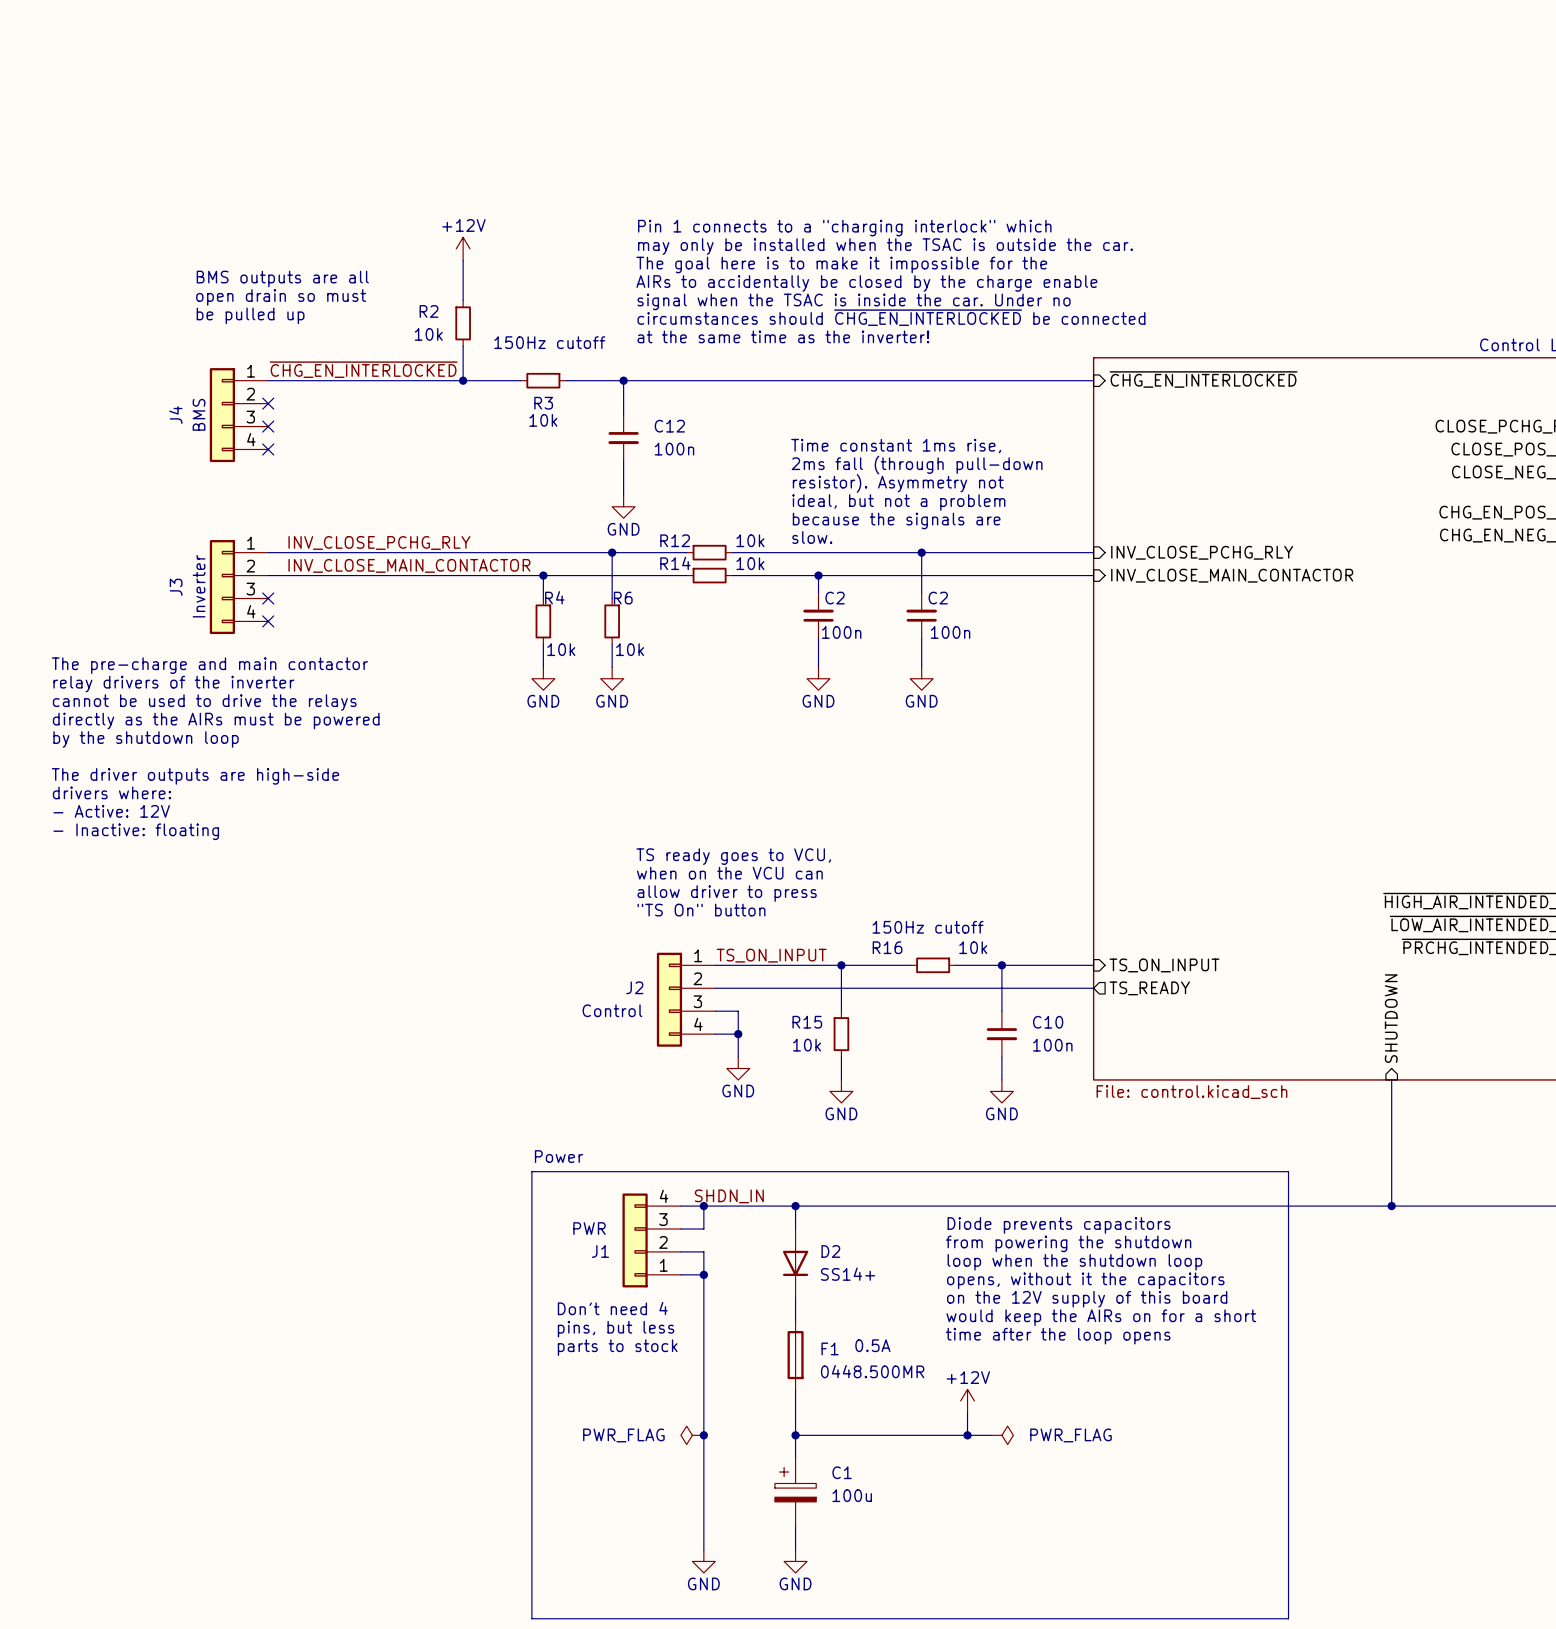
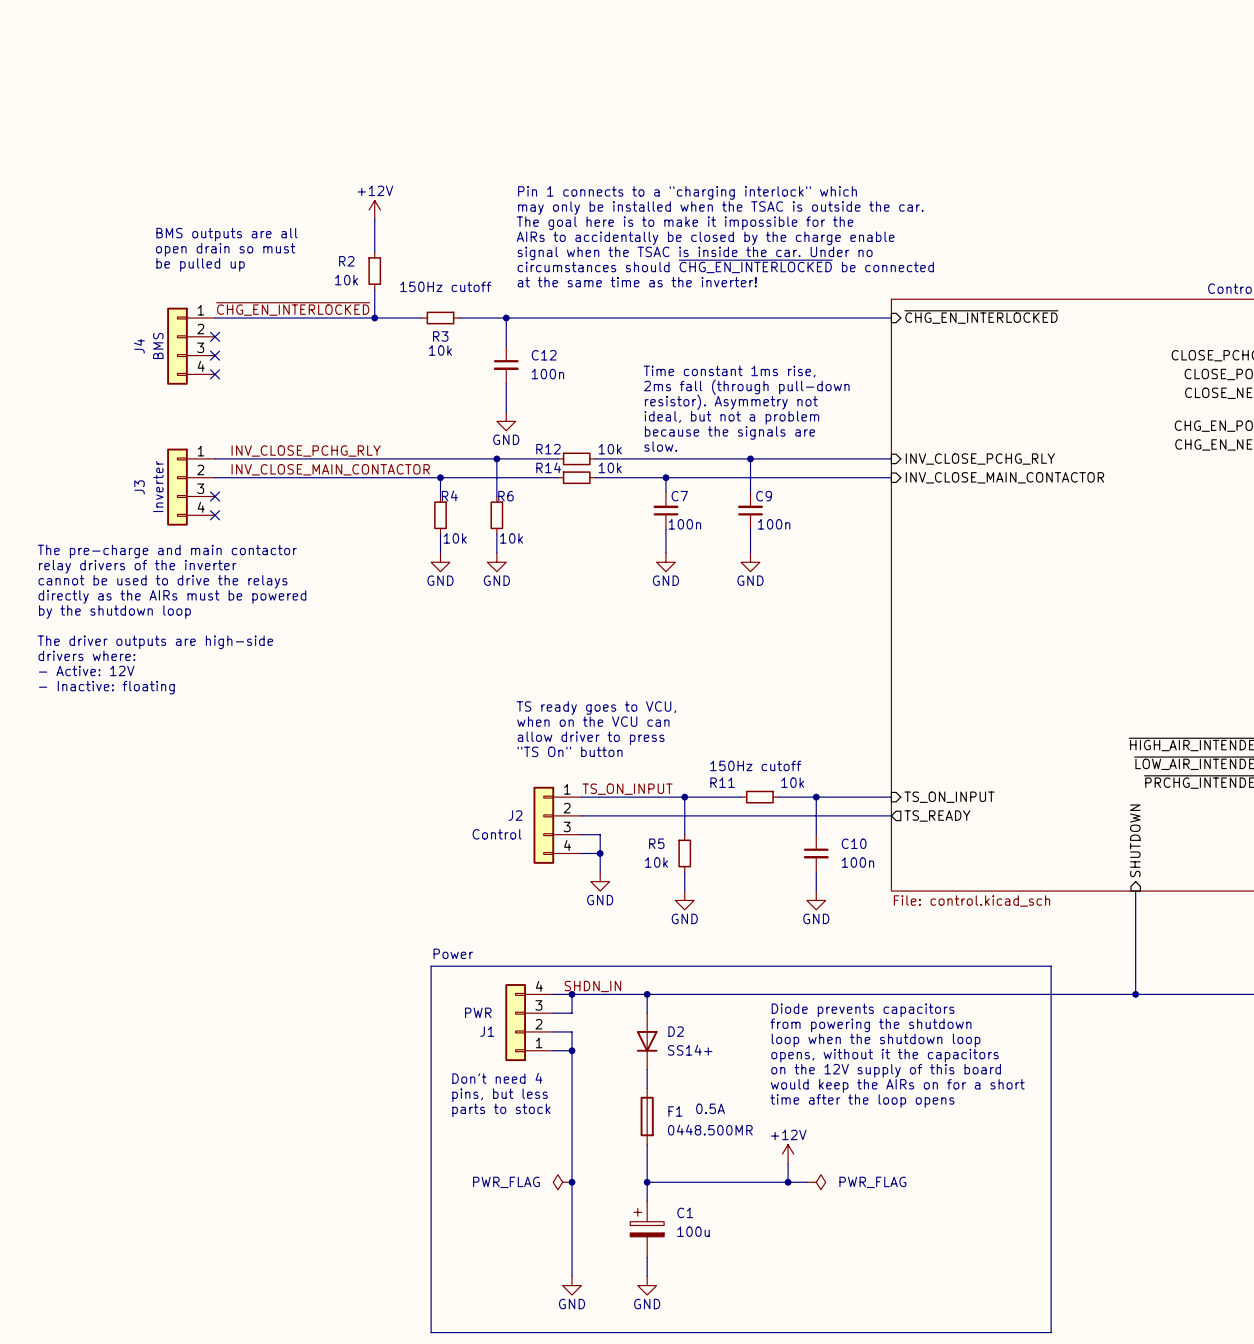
C2 name: C2 (835, 598) -> C7 (679, 496)
C2 name: C2 (938, 598) -> C9 (764, 496)
R16 name: R16 (887, 947) -> R11 (722, 782)
R15 name: R15 (807, 1022) -> R5 (656, 843)

